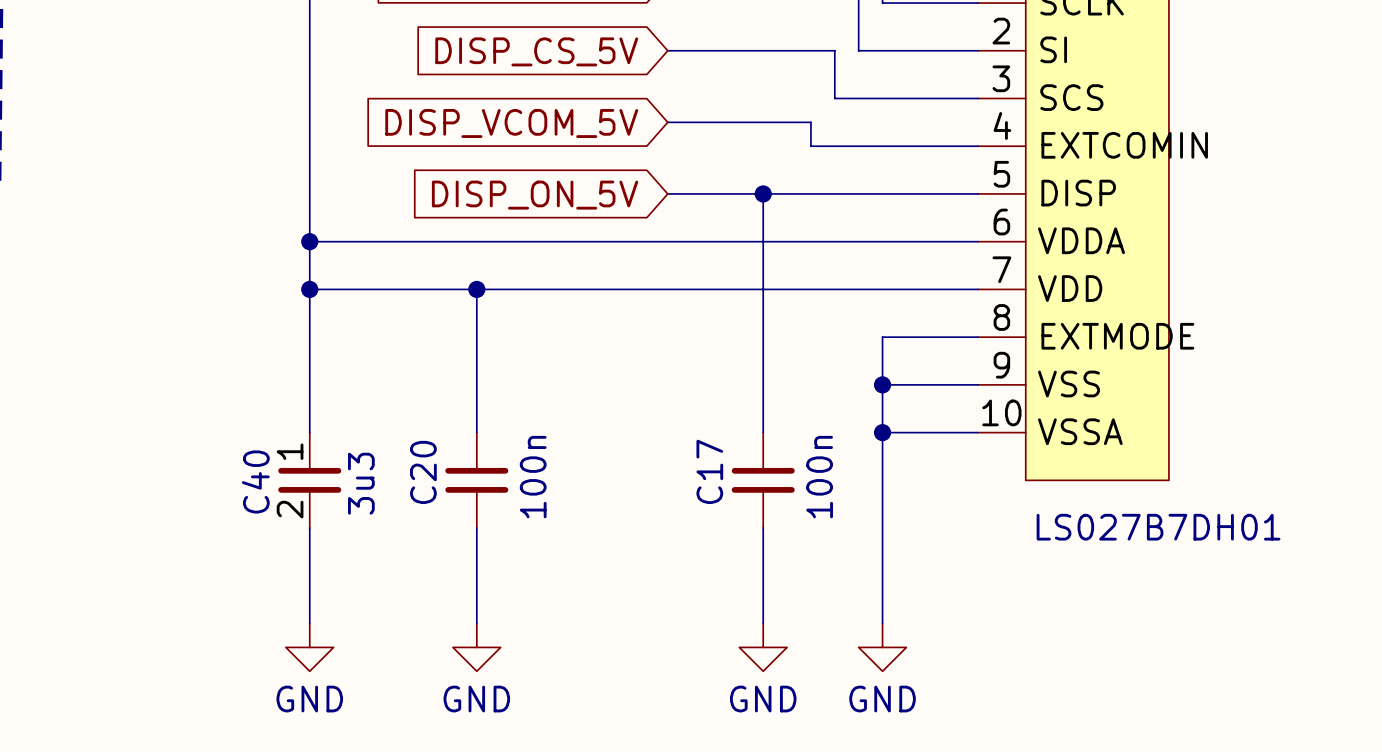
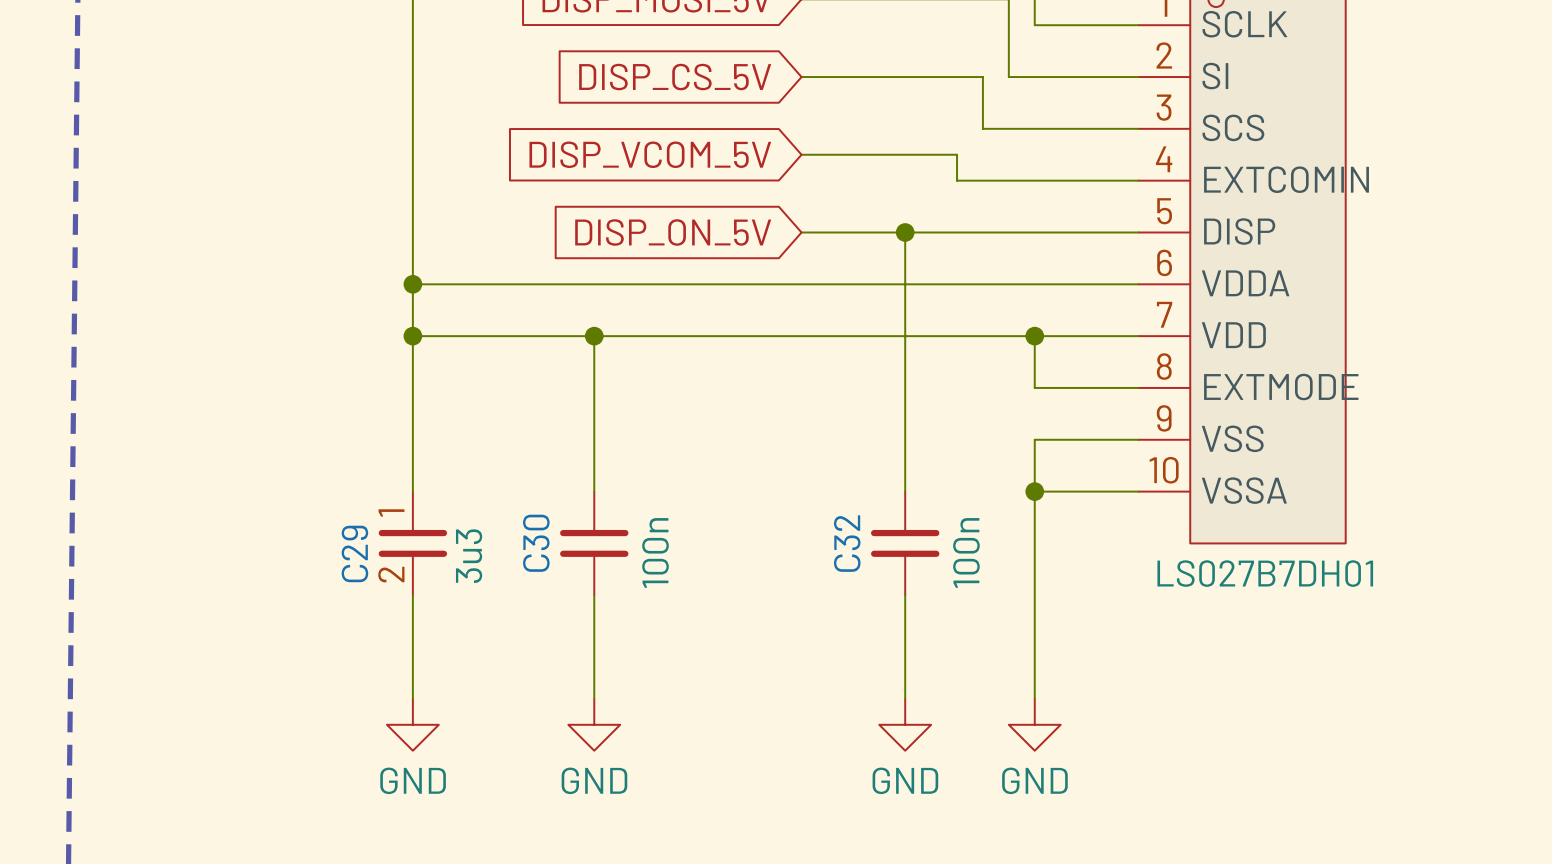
wire: (882, 337) (882, 384) -> (1034, 387) (1034, 336)
junction position: (882, 384) -> (1034, 336)
C17 name: C17 (709, 471) -> C32 (847, 543)
C20 name: C20 (423, 472) -> C30 (536, 543)
C40 name: C40 (255, 481) -> C29 (354, 553)
part value position: LS027B7DH01 (1158, 527) -> LS027B7DH01 (1265, 573)

